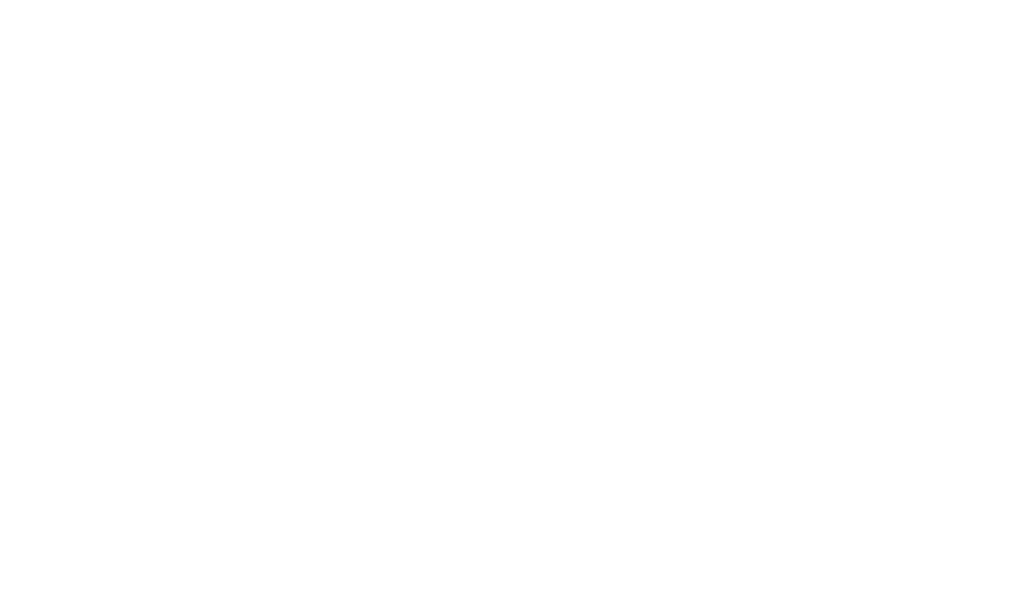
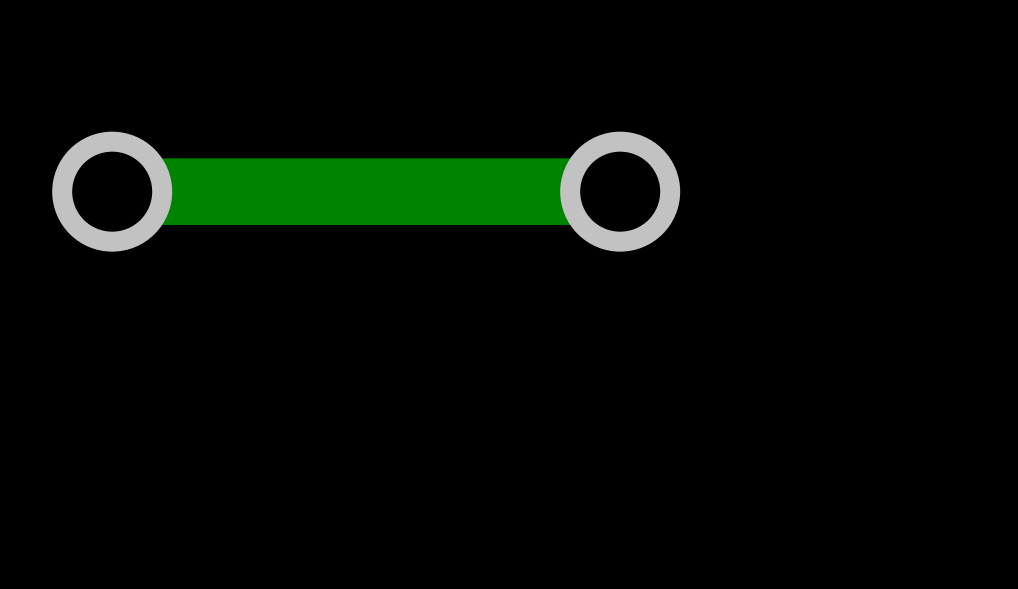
via: none -> (112, 191)
track: none -> (620, 191) (112, 191)
via: none -> (620, 191)

